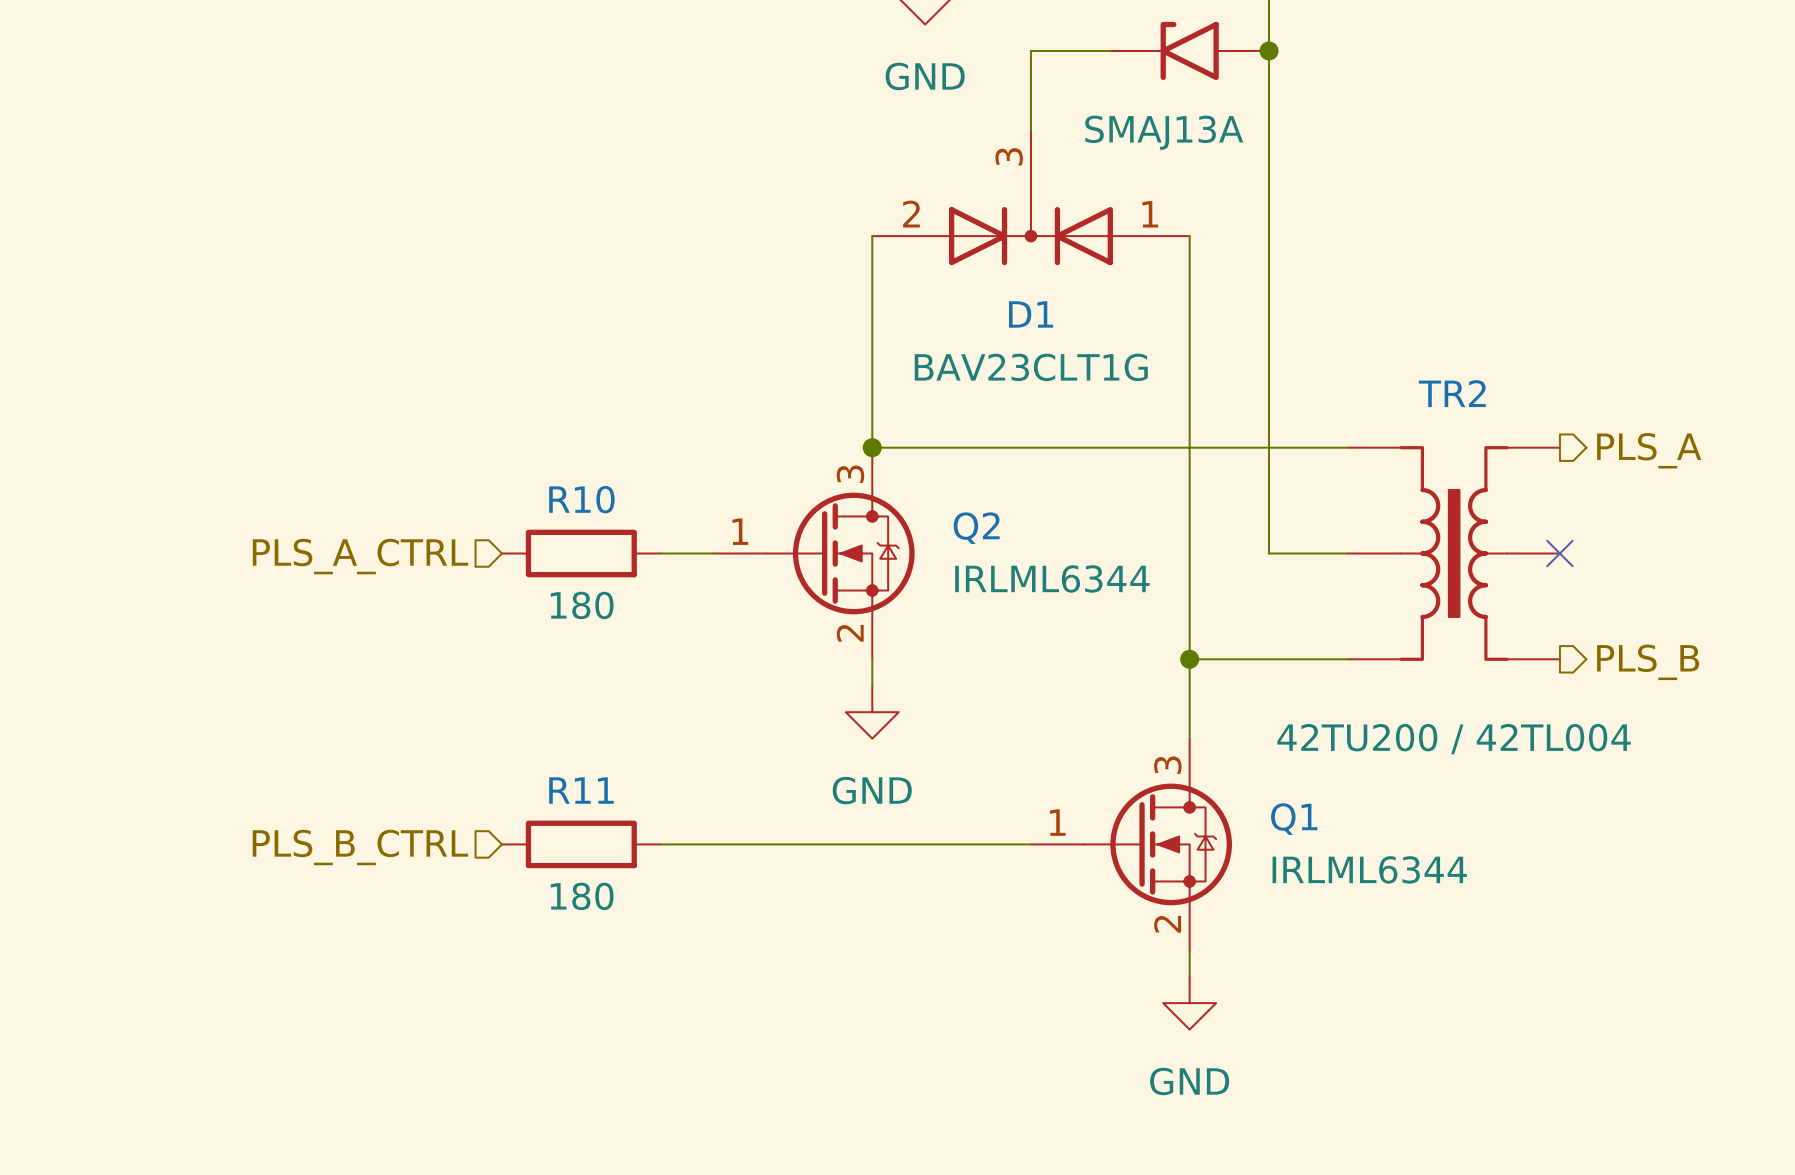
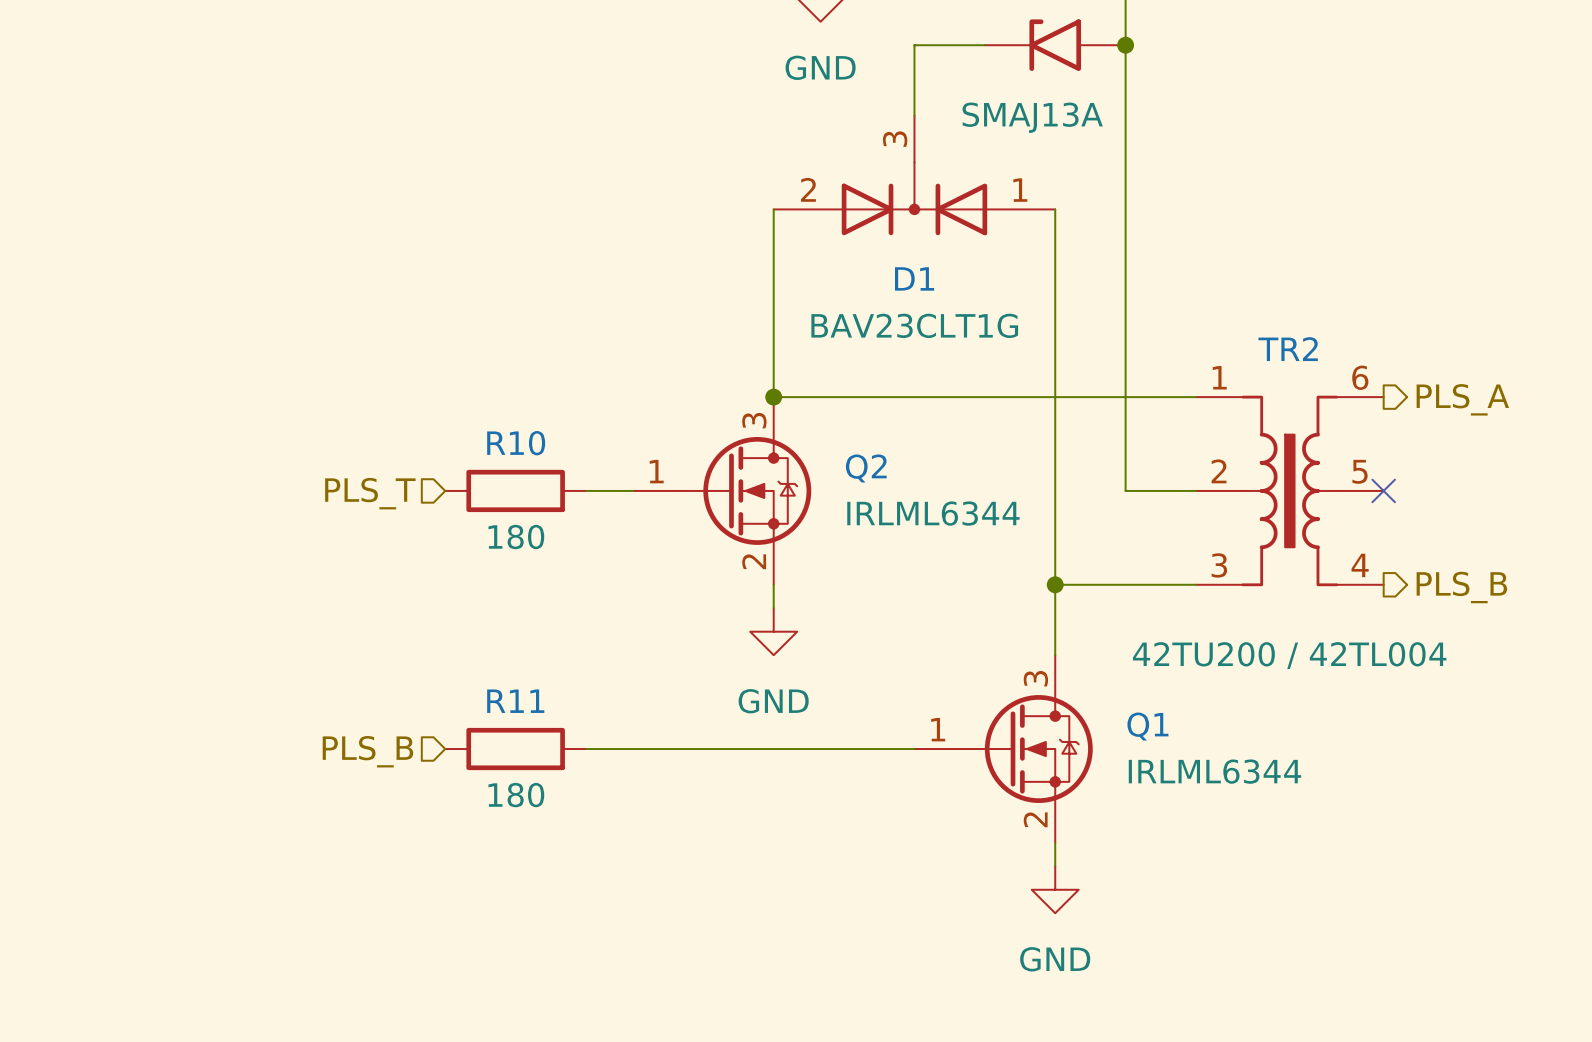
TR2 pin number: none -> 1 (1219, 377)
TR2 pin number: none -> 6 (1360, 377)
TR2 pin number: none -> 2 (1219, 471)
TR2 pin number: none -> 5 (1360, 471)
hierarchical label: PLS_A_CTRL (360, 556) -> PLS_T (370, 493)
TR2 pin number: none -> 3 (1219, 565)
TR2 pin number: none -> 4 (1360, 565)
hierarchical label: PLS_B_CTRL (360, 847) -> PLS_B (367, 751)

